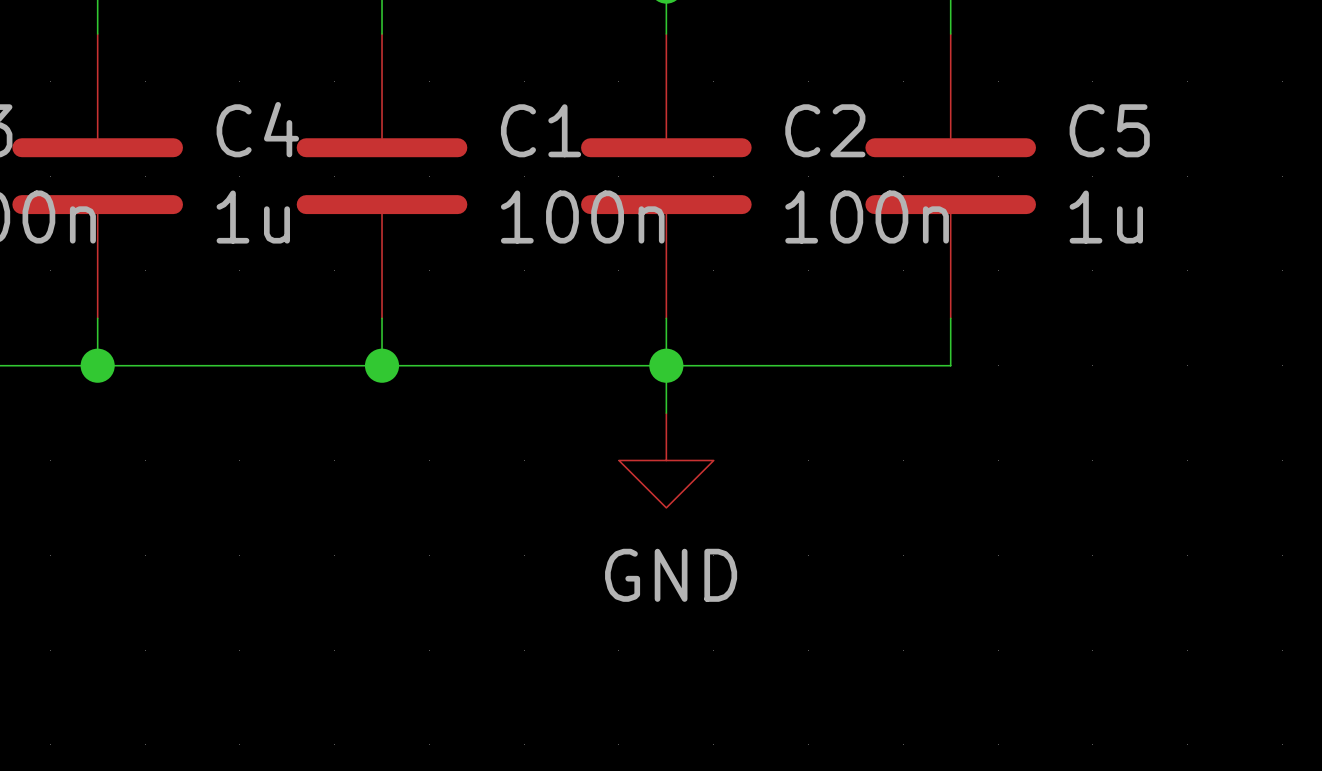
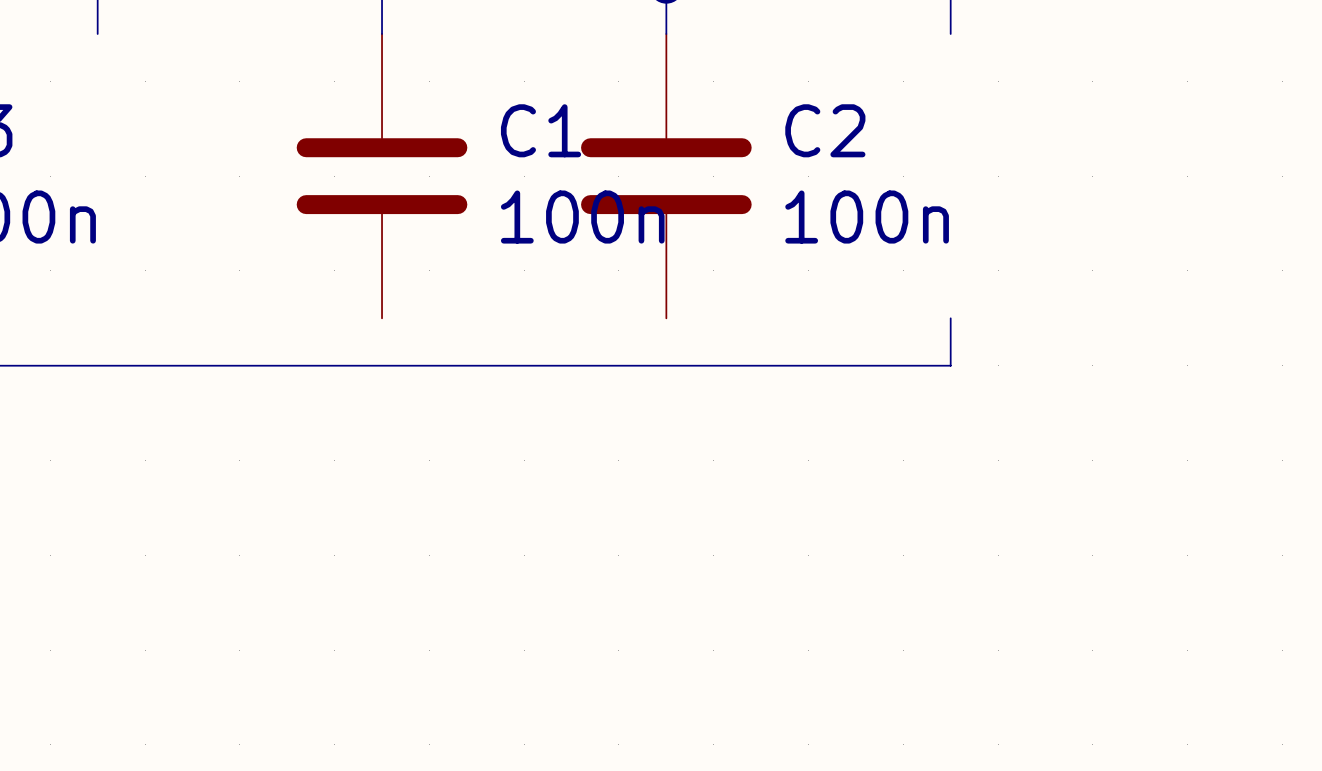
C4: 1u (97, 176) -> none
C5: 1u (950, 176) -> none
wire: (97, 318) (97, 365) -> none
wire: (382, 318) (382, 365) -> none
wire: (666, 318) (666, 413) -> none
junction: (97, 365) -> none
junction: (382, 365) -> none
junction: (666, 365) -> none
power symbol: GND (666, 460) -> none

